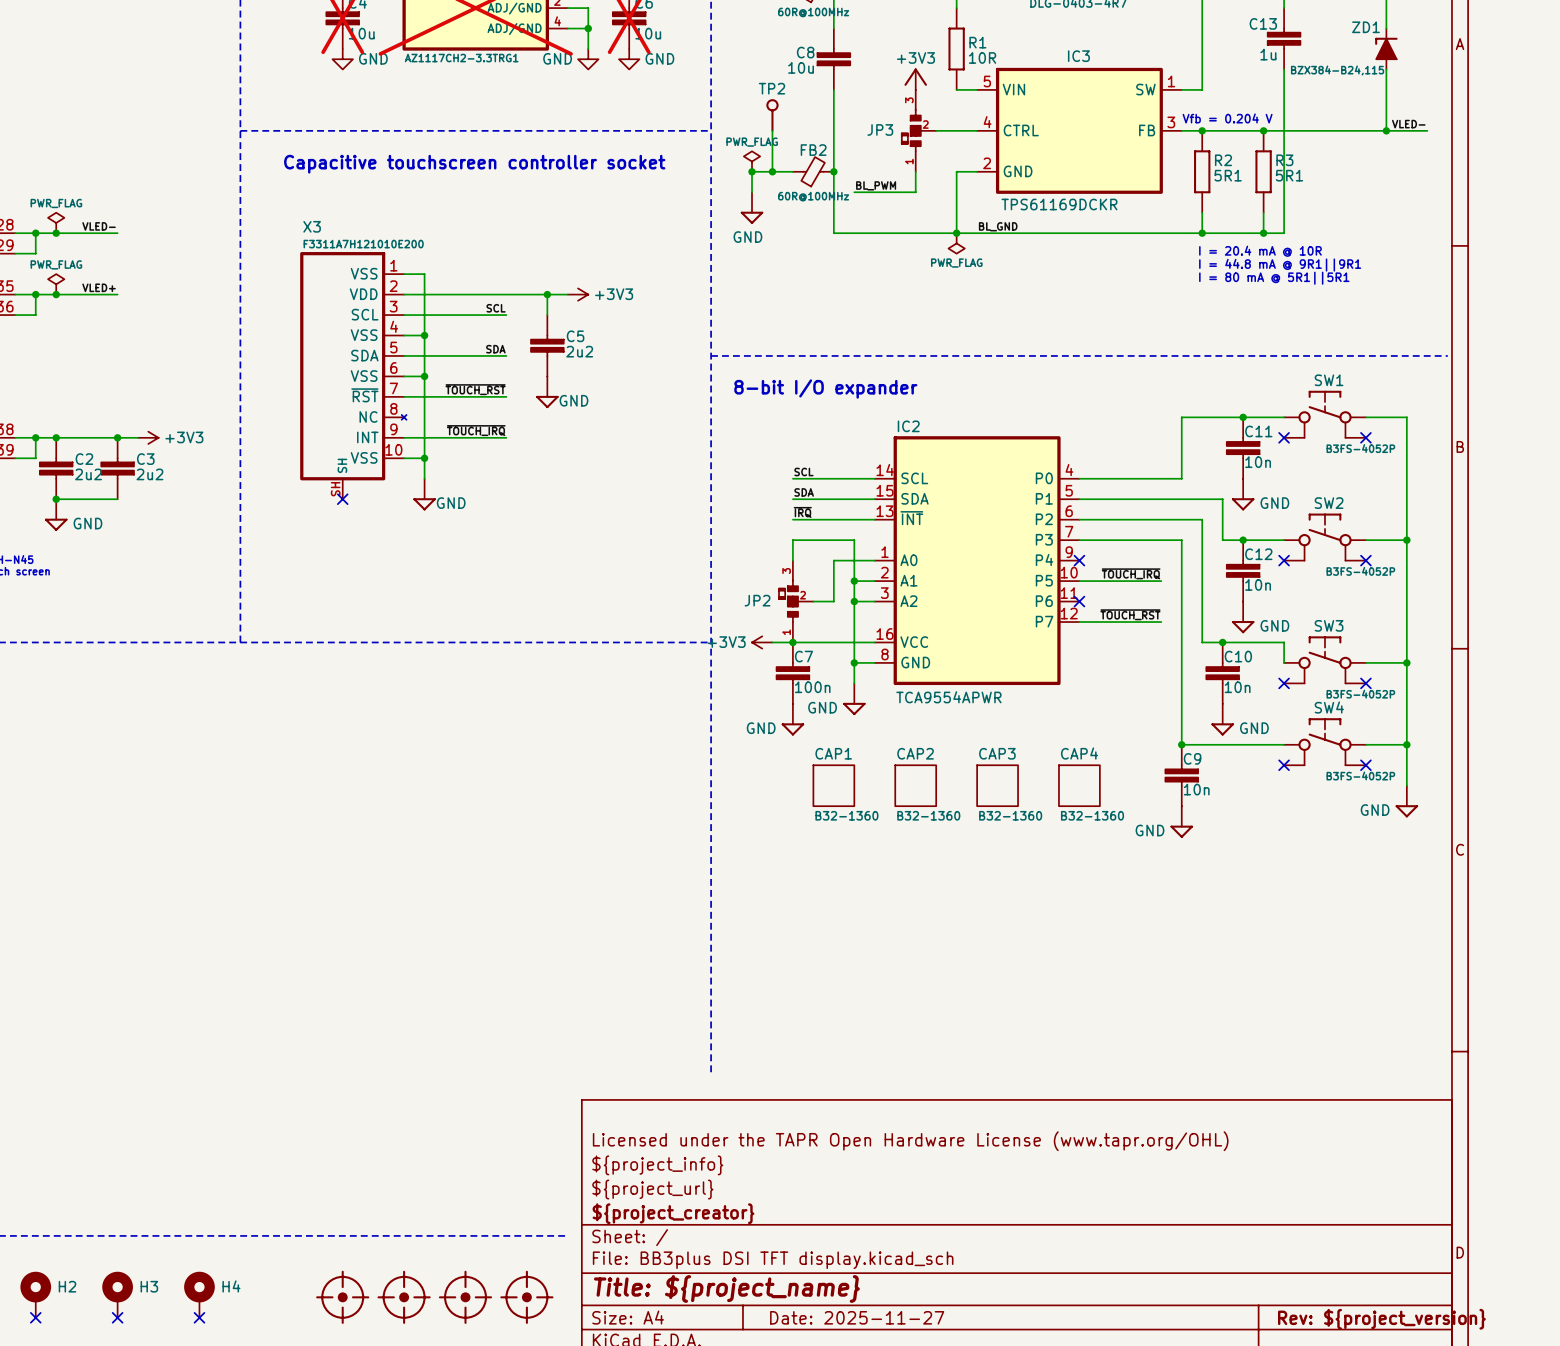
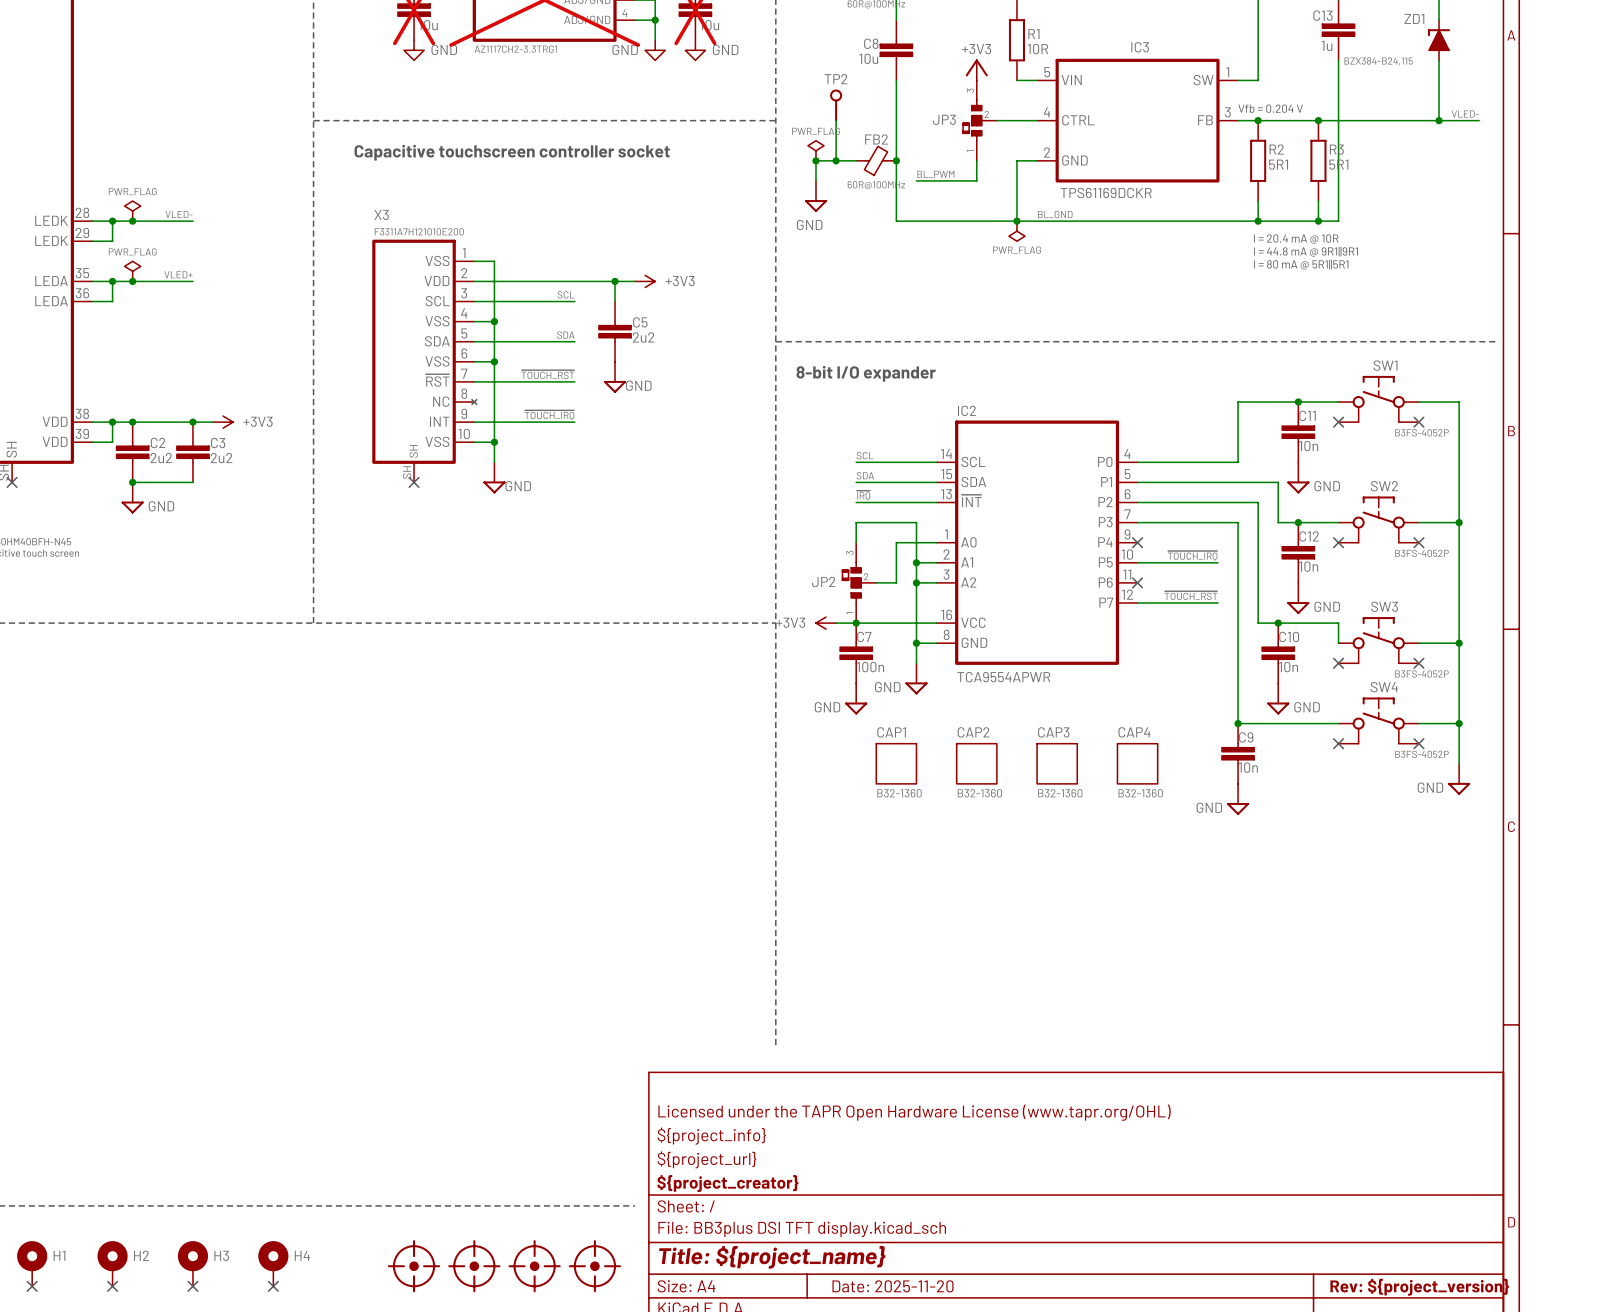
title block: Date: 2025-11-27 (857, 1317) -> Date: 2025-11-20 (892, 1286)

